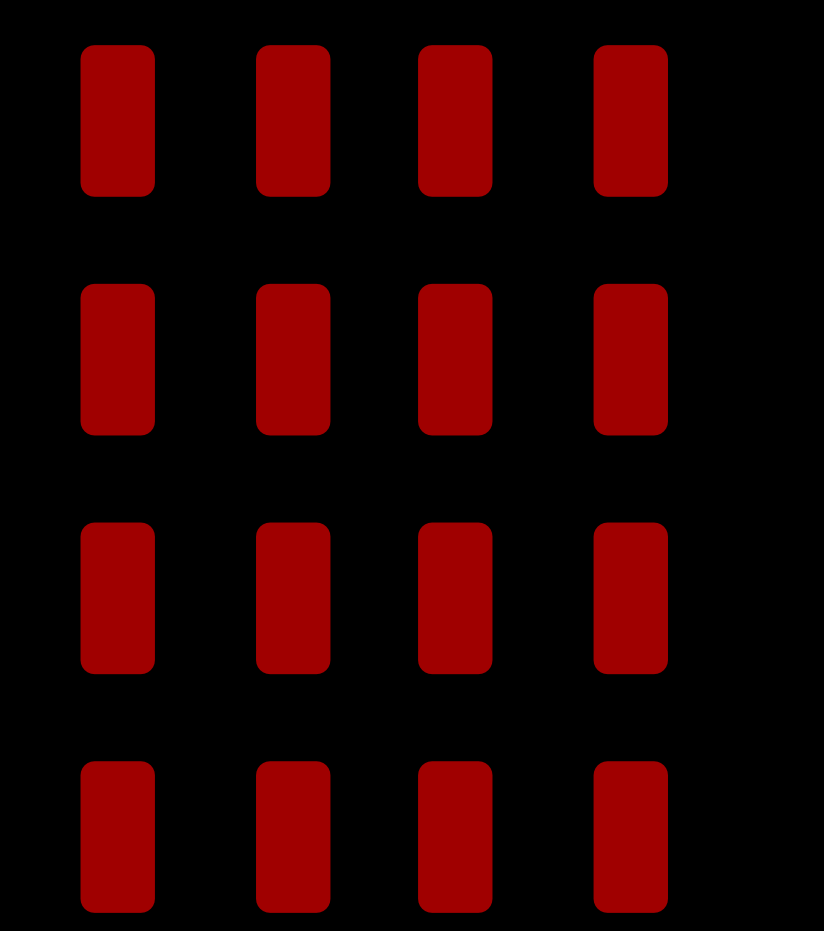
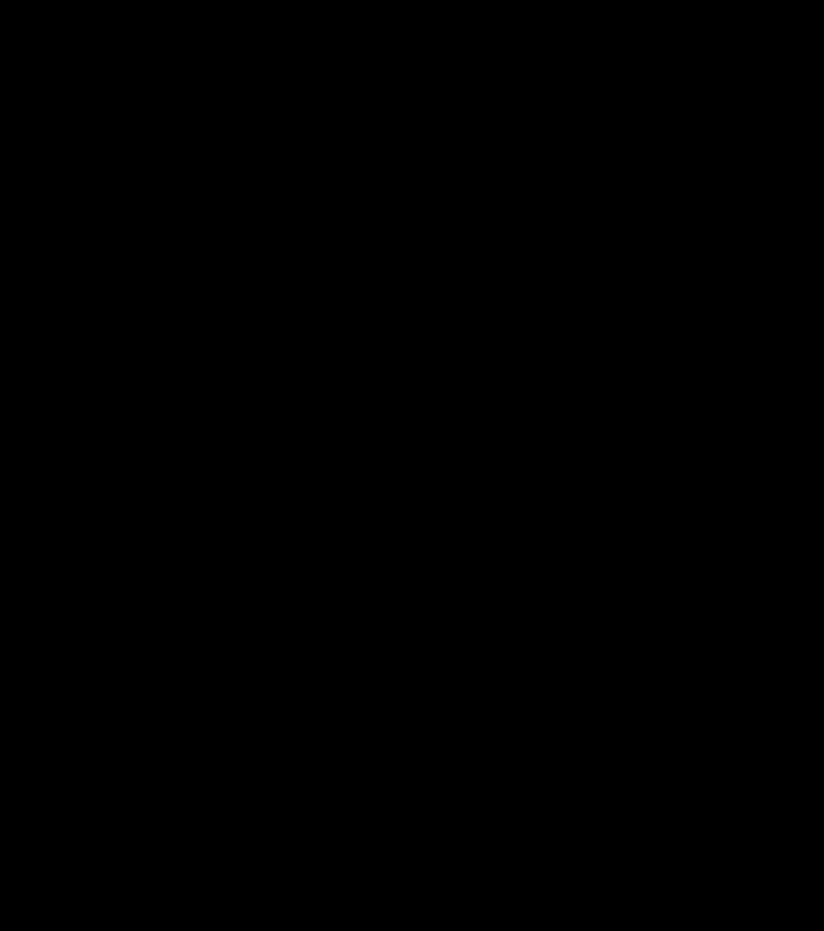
part: (205, 120) -> none
part: (543, 120) -> none
part: (205, 359) -> none
part: (543, 359) -> none
part: (205, 598) -> none
part: (543, 598) -> none
part: (205, 837) -> none
part: (543, 837) -> none

